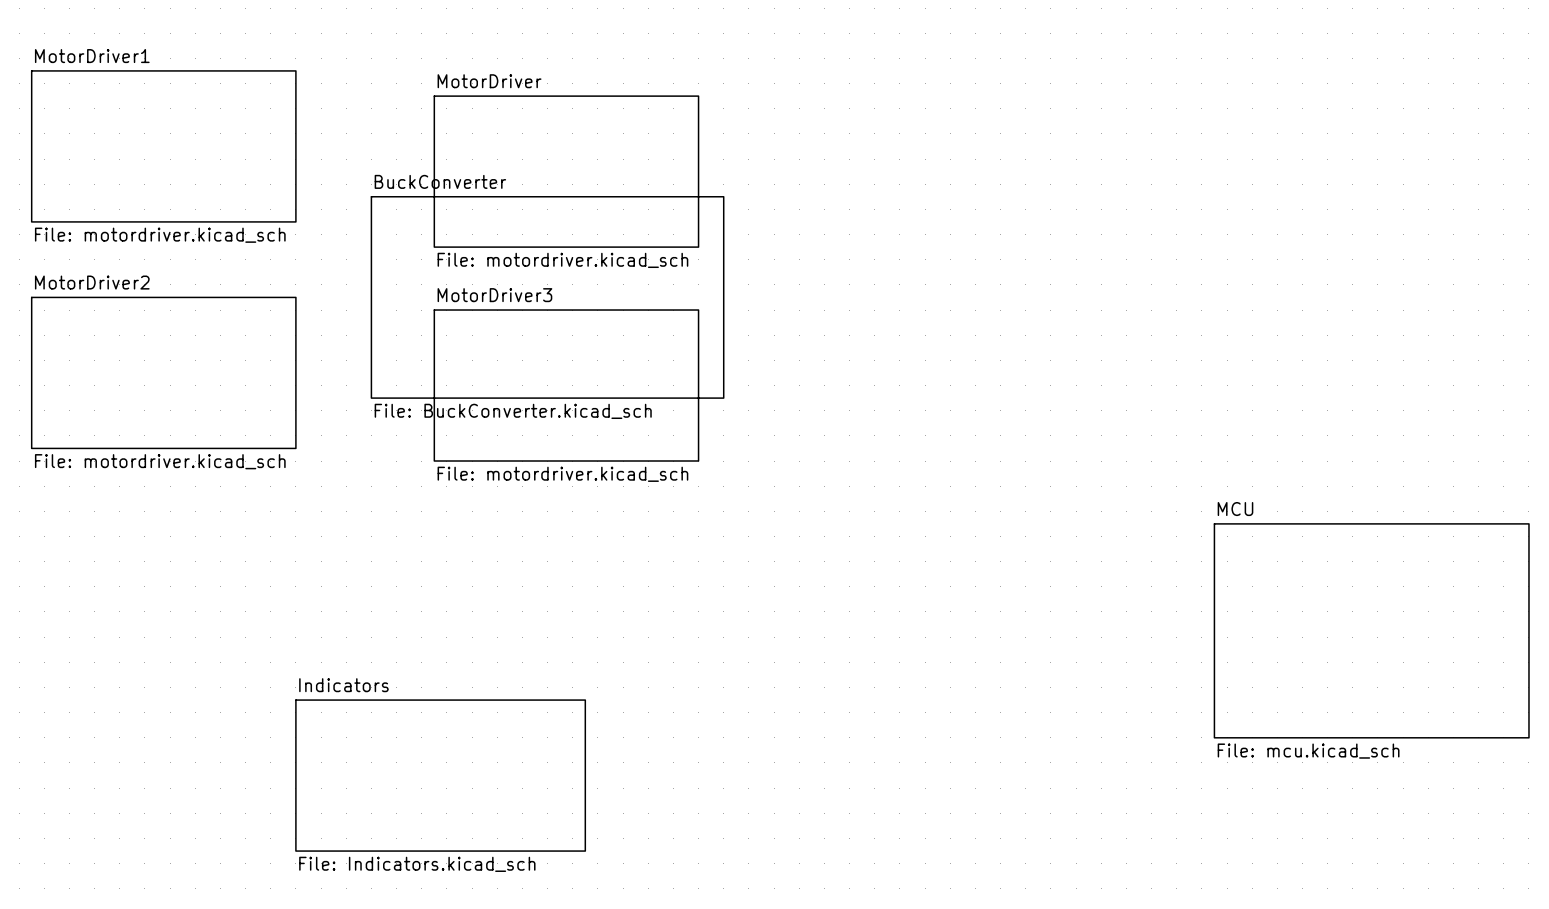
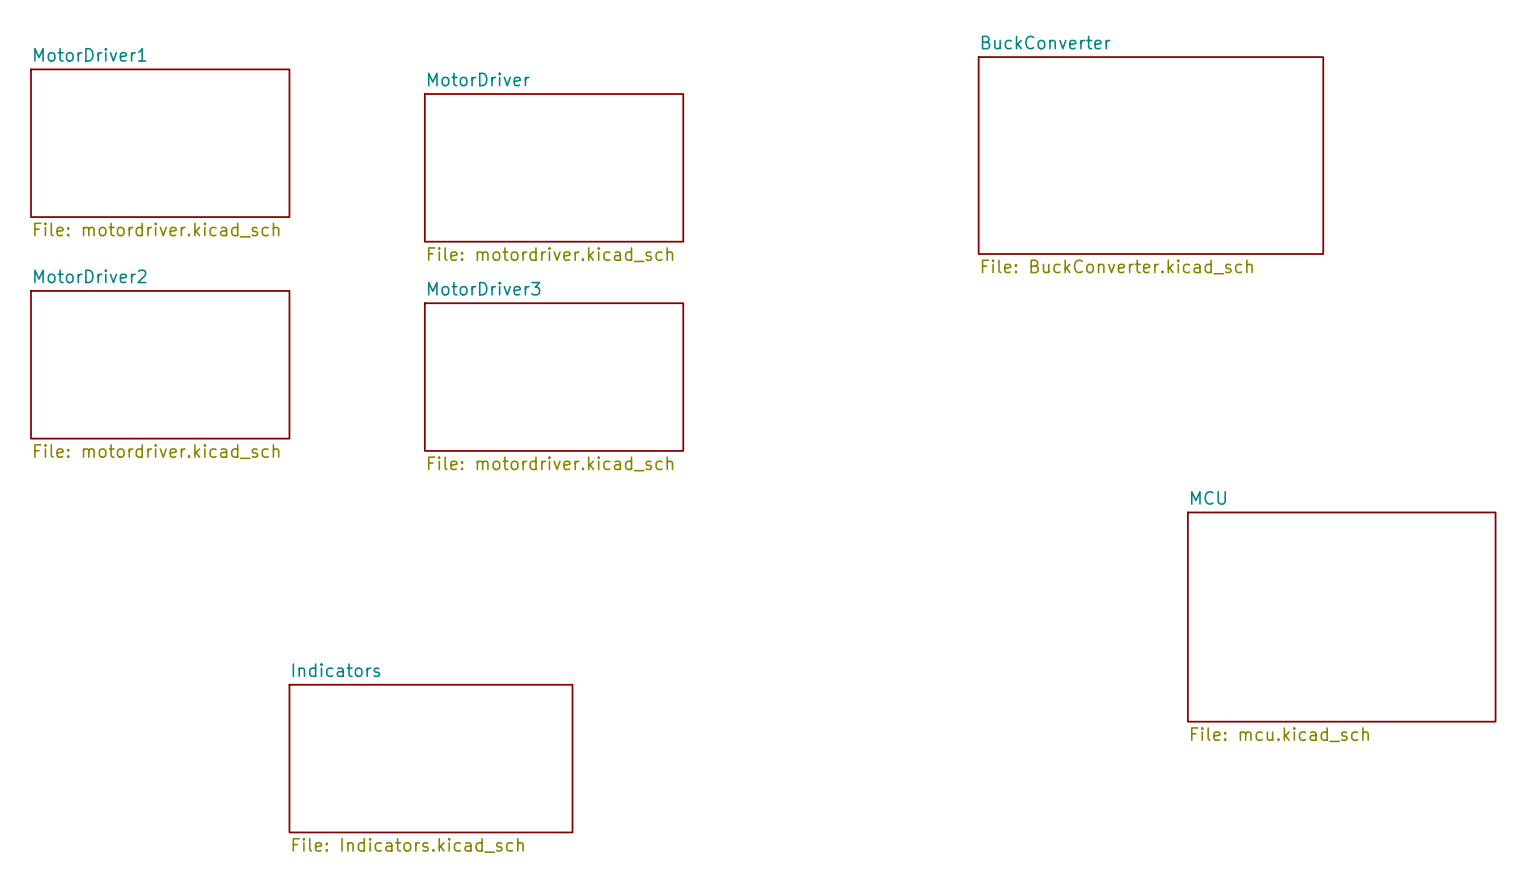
sheet BuckConverter: none -> File: BuckConverter.kicad_sch (1150, 155)
sheet BuckConverter: File: BuckConverter.kicad_sch (547, 297) -> none

